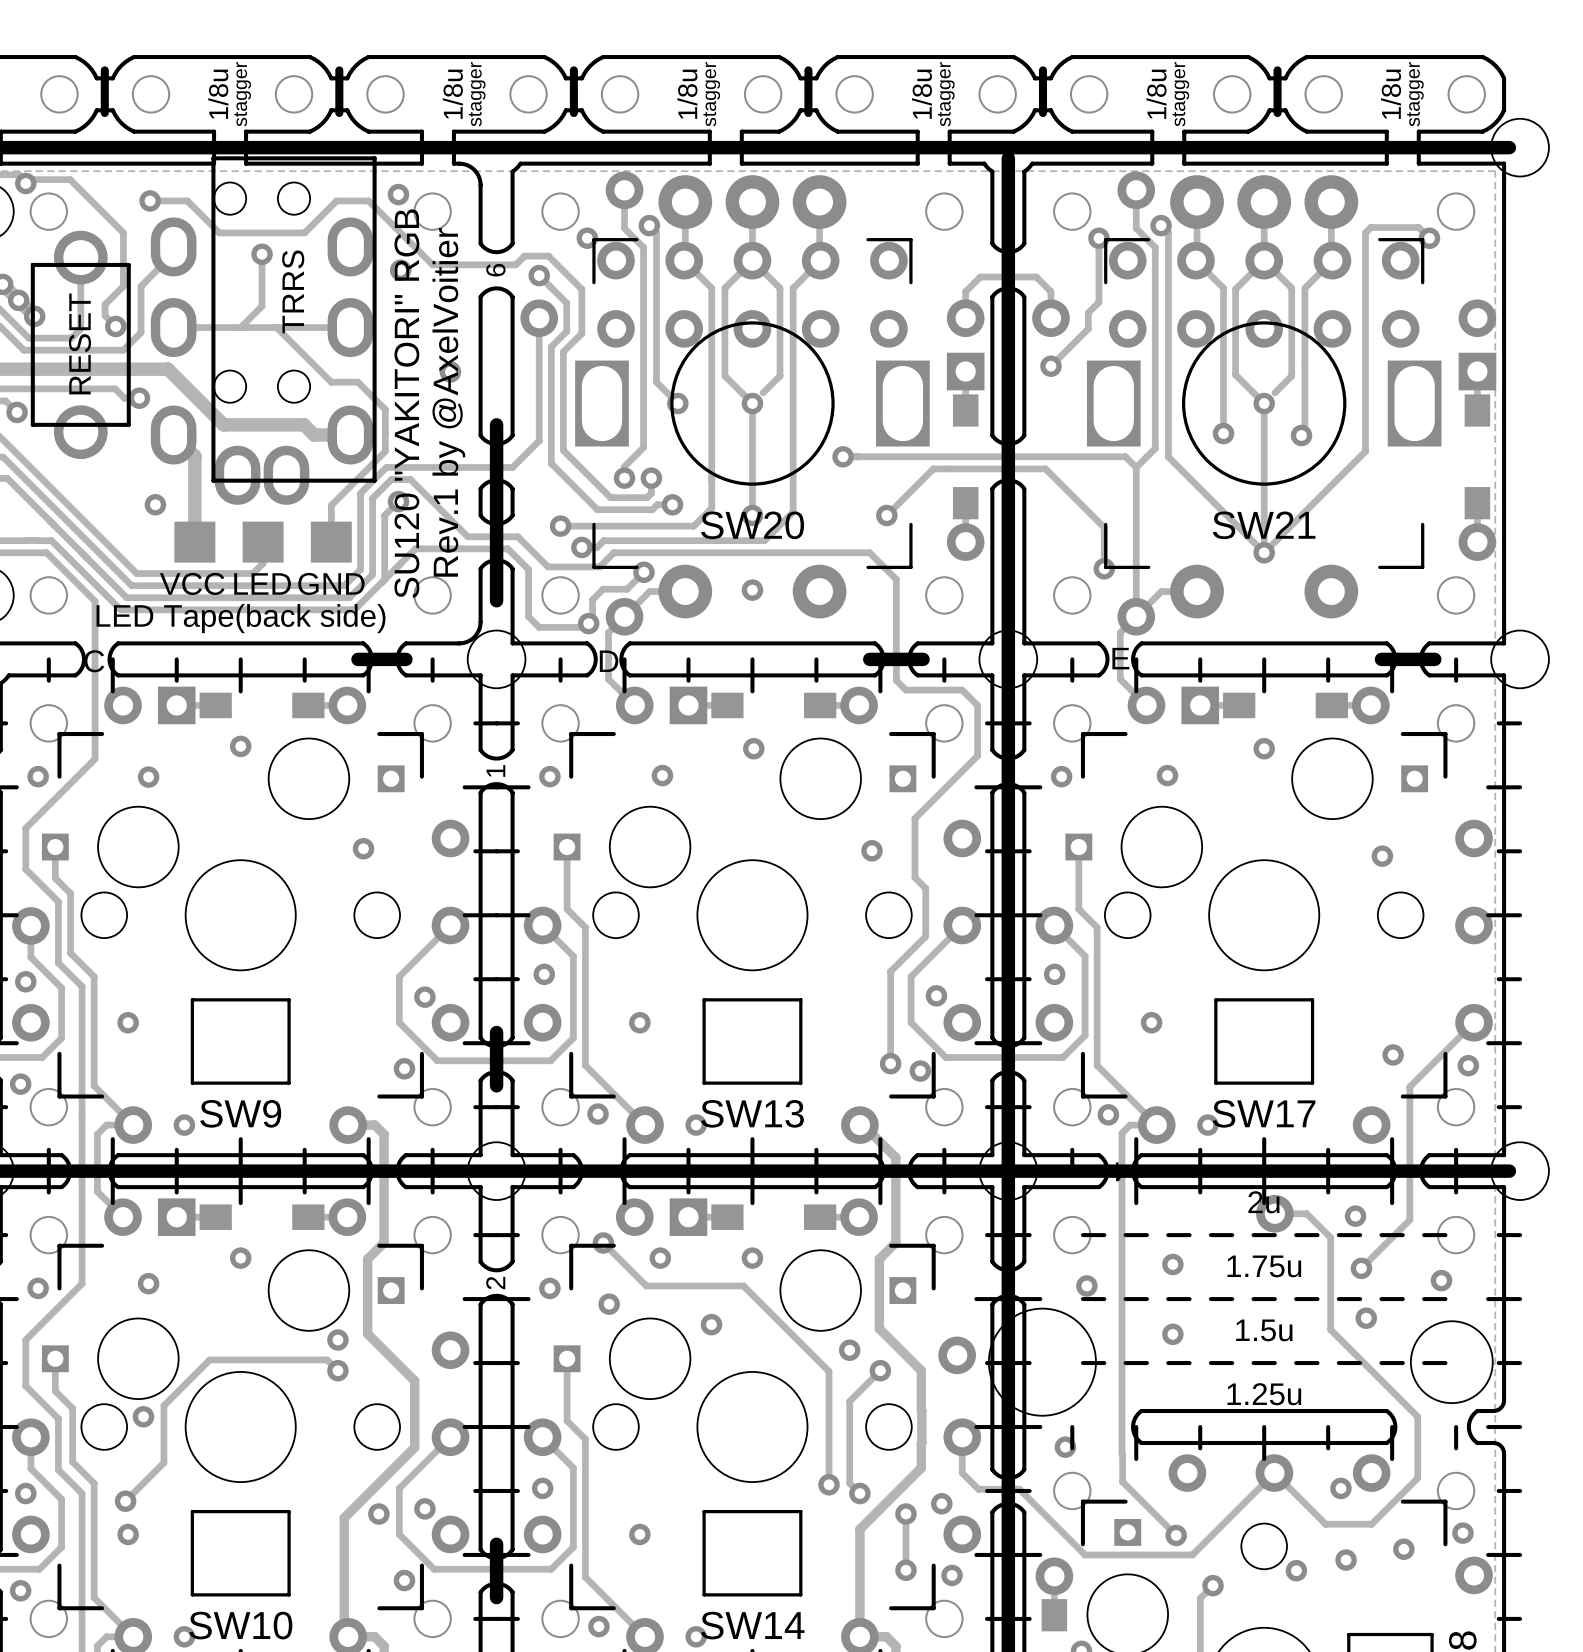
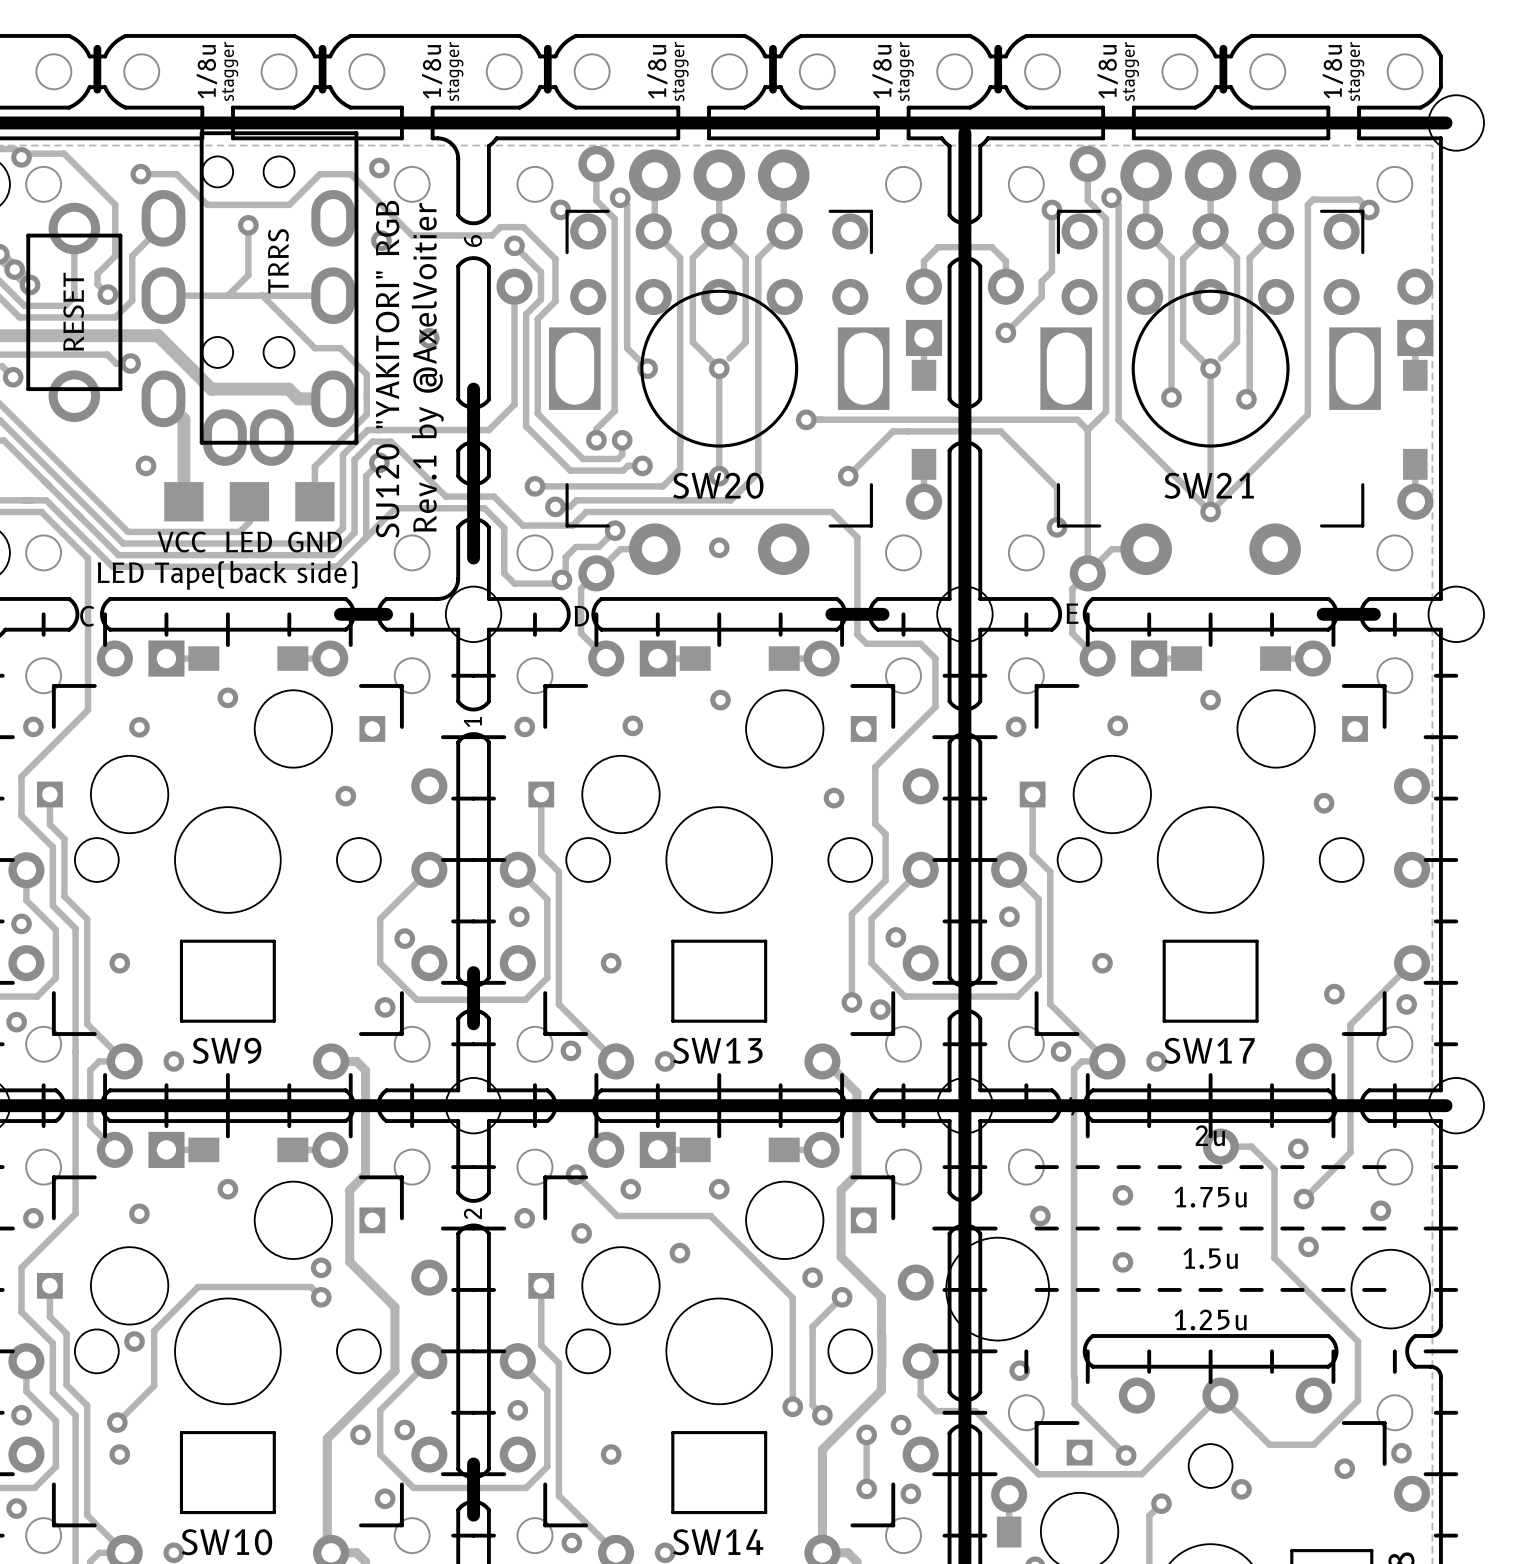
via: (1340, 1488) -> none
via: (1346, 1560) -> none

